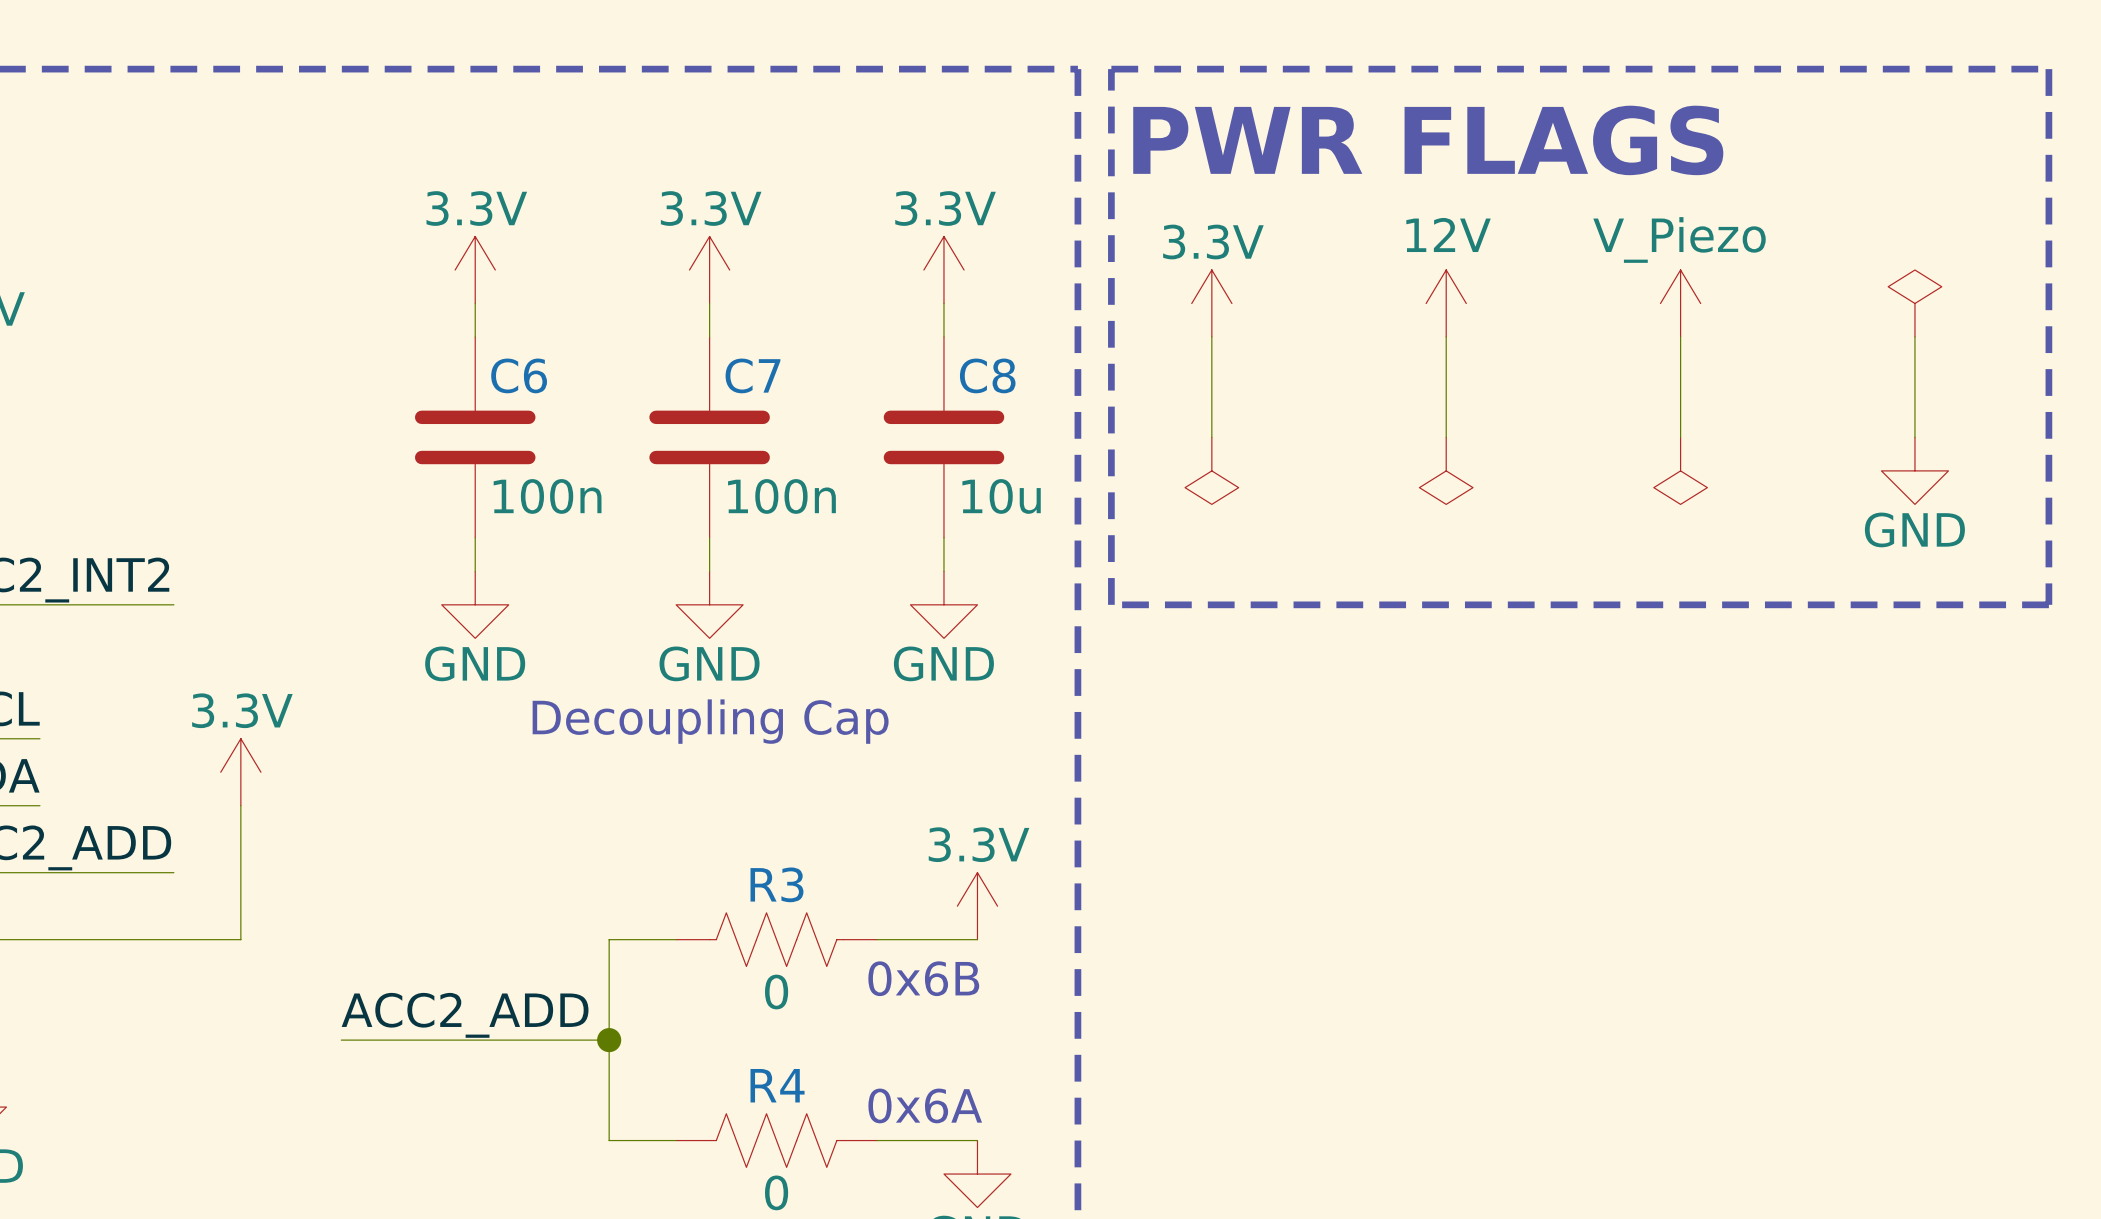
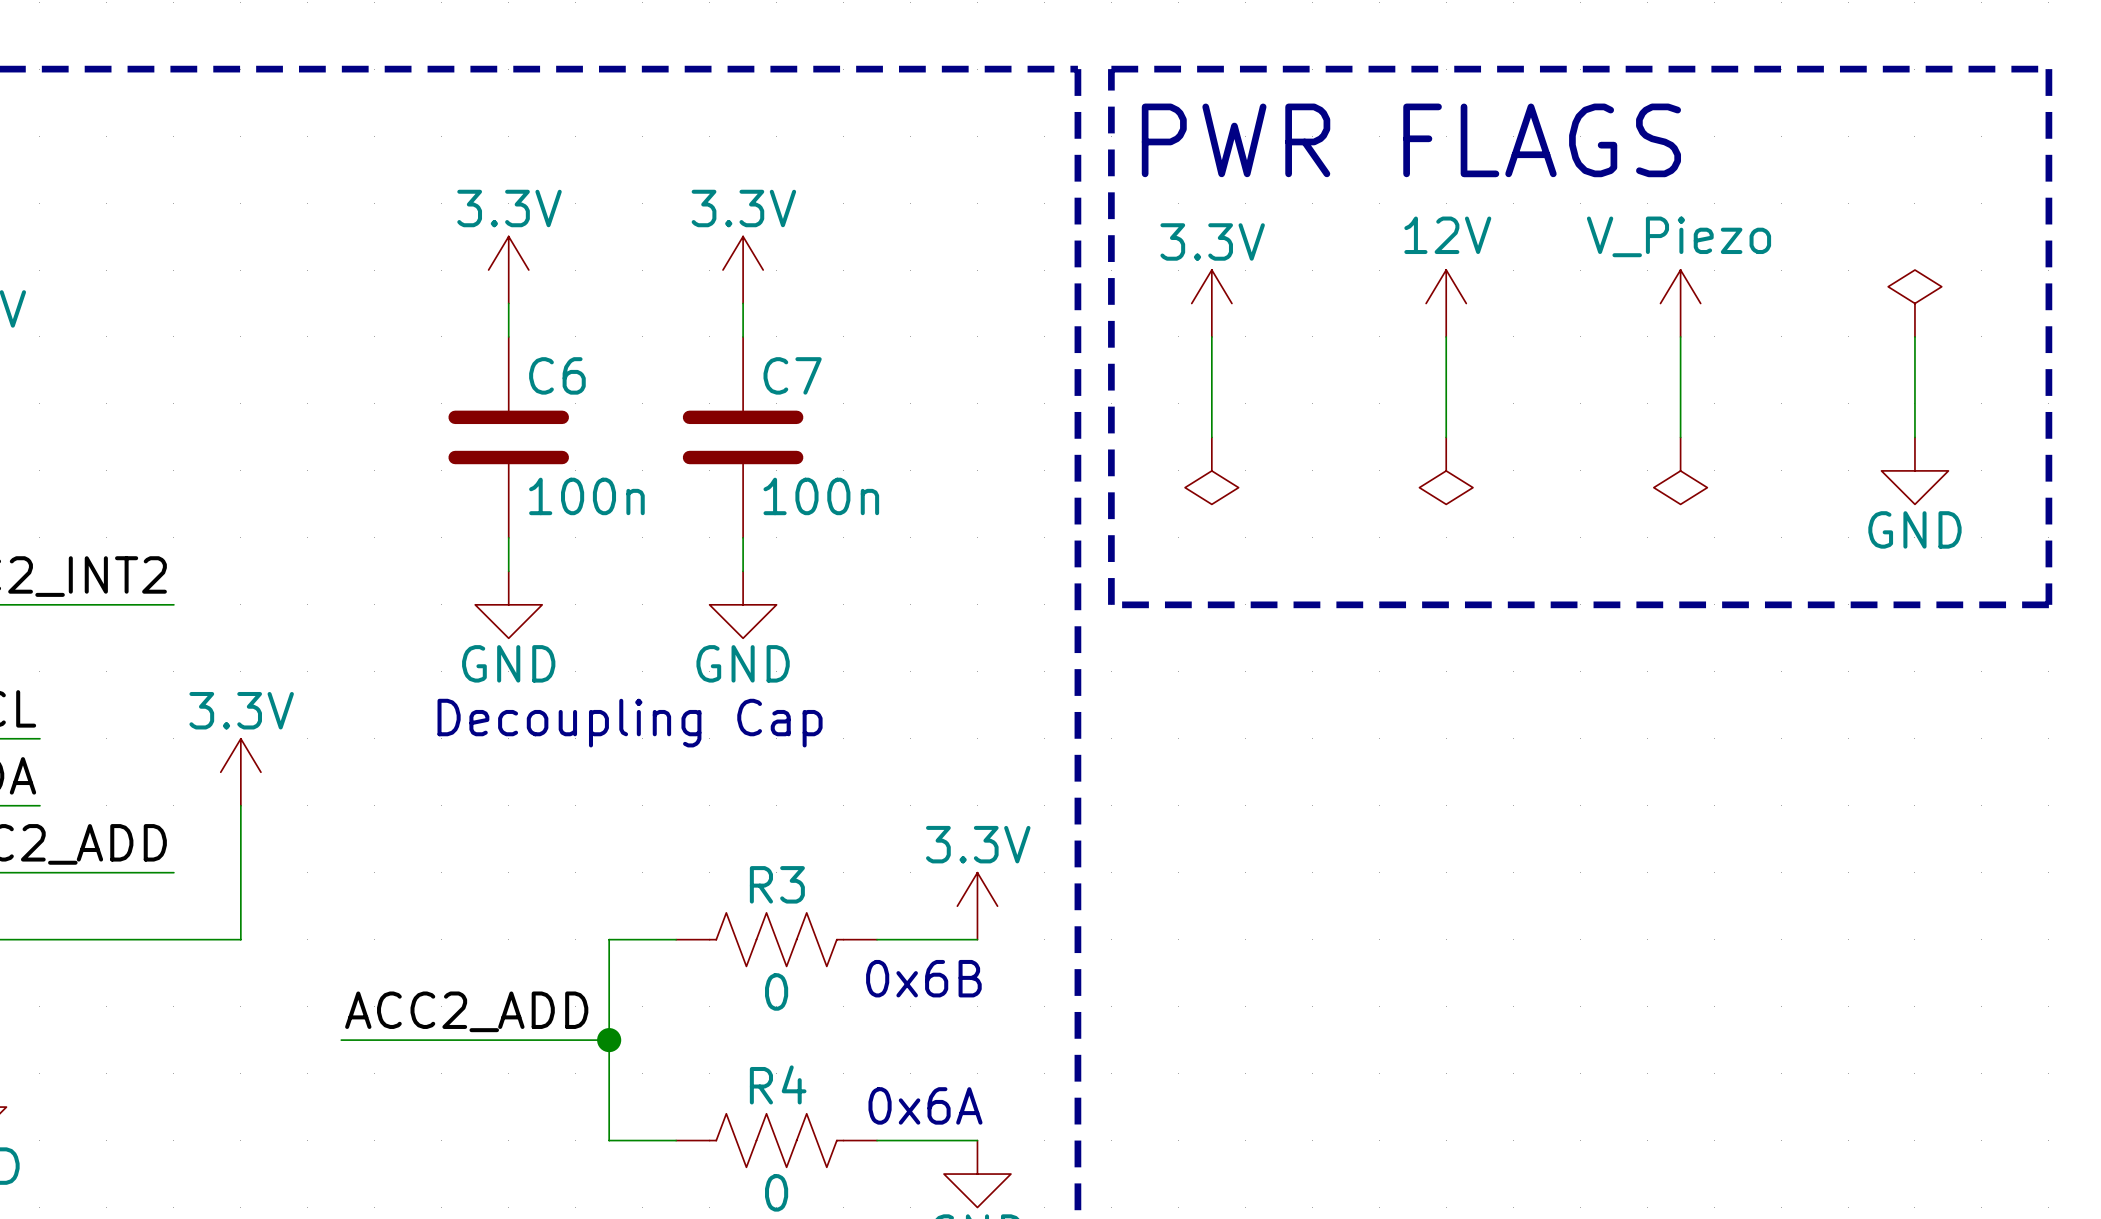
power symbol position: 3.3V (475, 270) -> 3.3V (508, 270)
power symbol position: 3.3V (709, 270) -> 3.3V (743, 270)
power symbol: 3.3V (943, 270) -> none
wire: (475, 303) (475, 336) -> (508, 303) (508, 336)
wire: (709, 303) (709, 336) -> (743, 303) (743, 336)
wire: (943, 303) (943, 336) -> none
C6 position: (475, 437) -> (508, 437)
C7 position: (709, 437) -> (743, 437)
C8: 10u (943, 437) -> none
wire: (475, 537) (475, 571) -> (508, 537) (508, 571)
wire: (709, 537) (709, 571) -> (743, 537) (743, 571)
wire: (943, 537) (943, 571) -> none
power symbol position: GND (475, 604) -> GND (508, 604)
power symbol position: GND (709, 604) -> GND (743, 604)
power symbol: GND (943, 604) -> none
text position: Decoupling Cap (710, 721) -> Decoupling Cap (630, 723)

